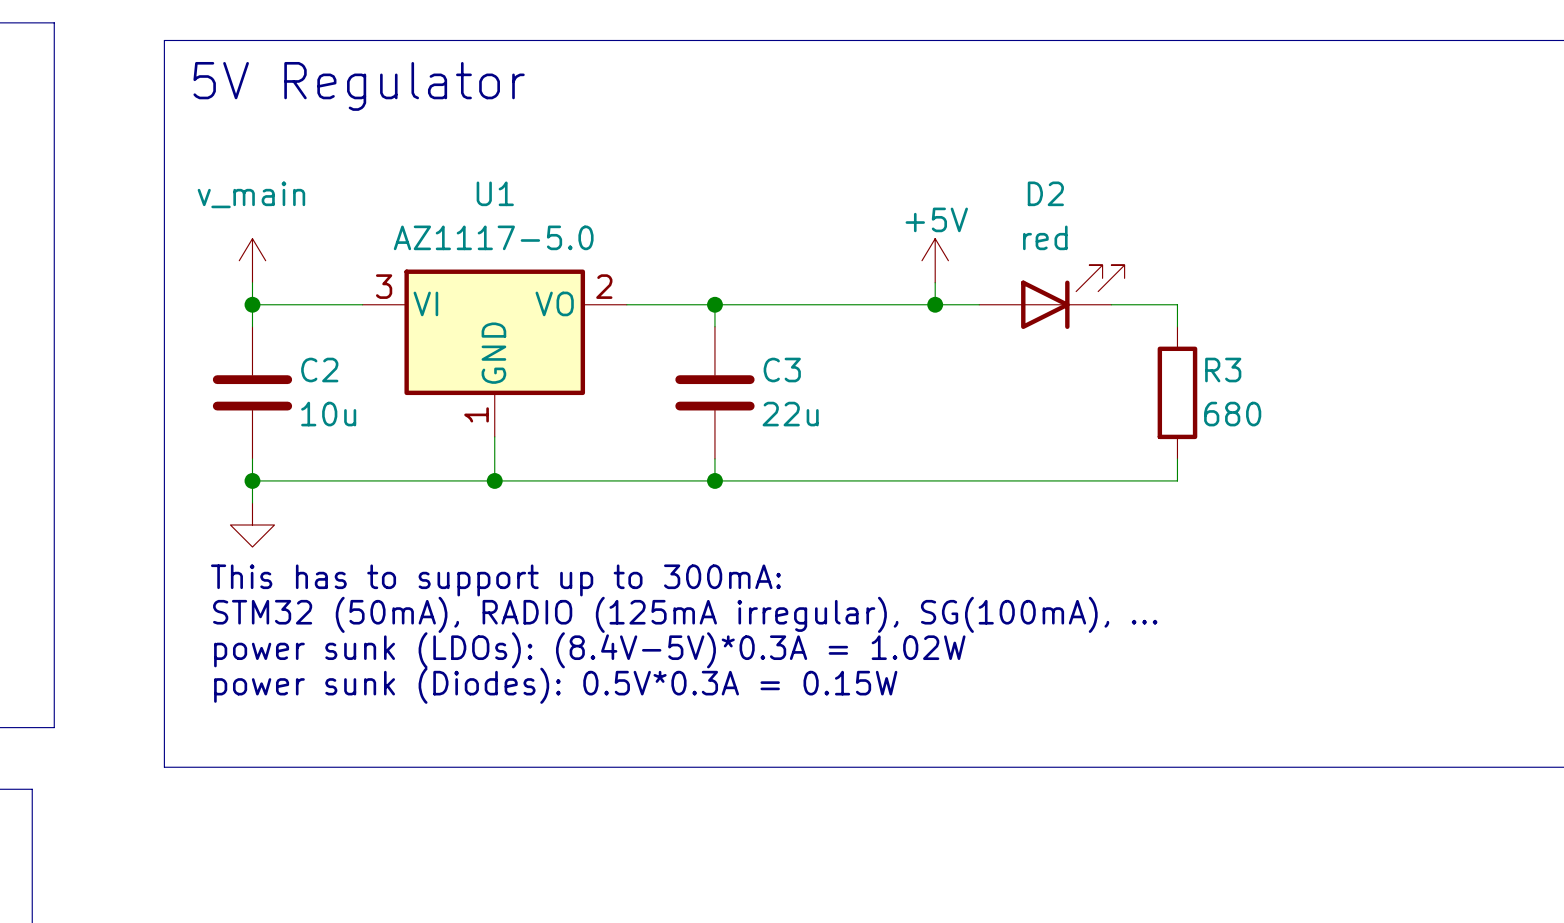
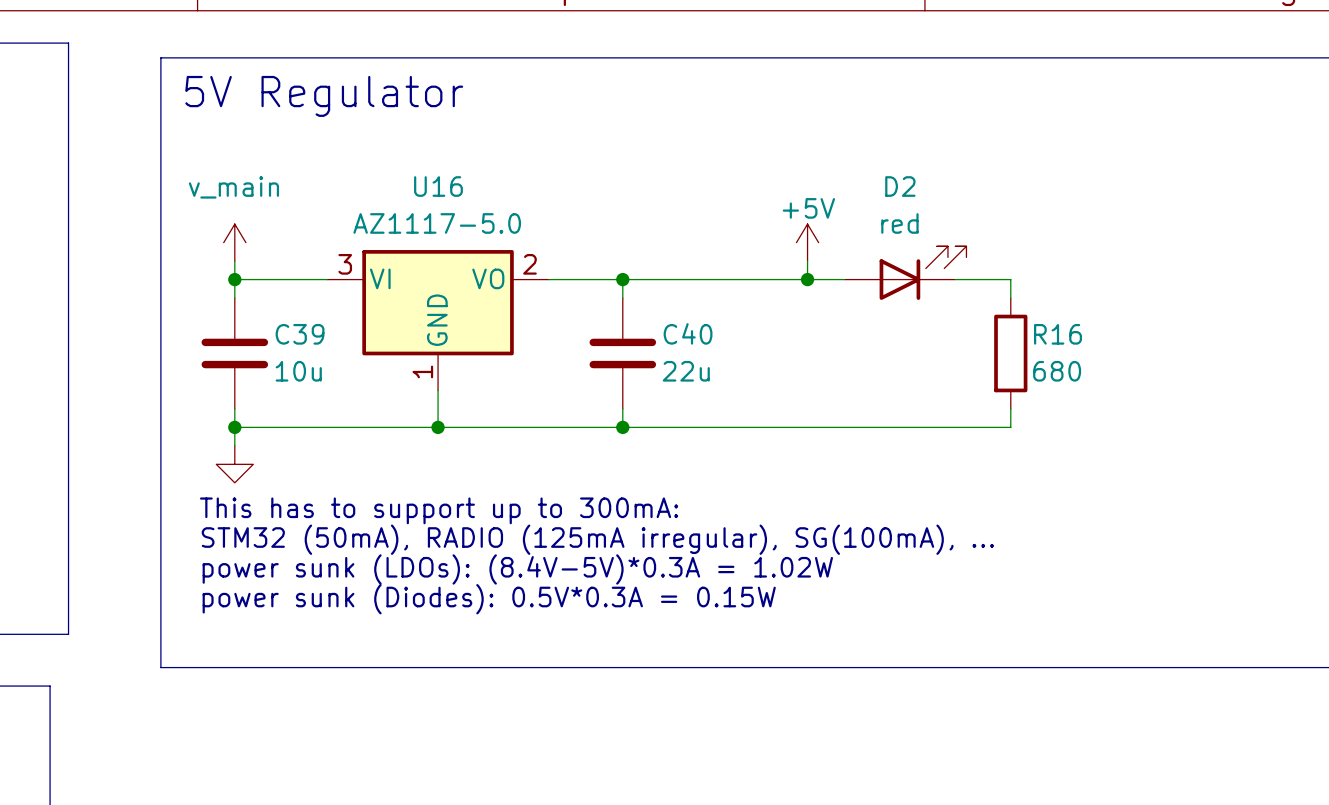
U1 name: U1 (495, 193) -> U16 (438, 186)
C2 name: C2 (319, 370) -> C39 (300, 334)
C3 name: C3 (782, 370) -> C40 (688, 333)
R3 name: R3 (1223, 370) -> R16 (1057, 334)

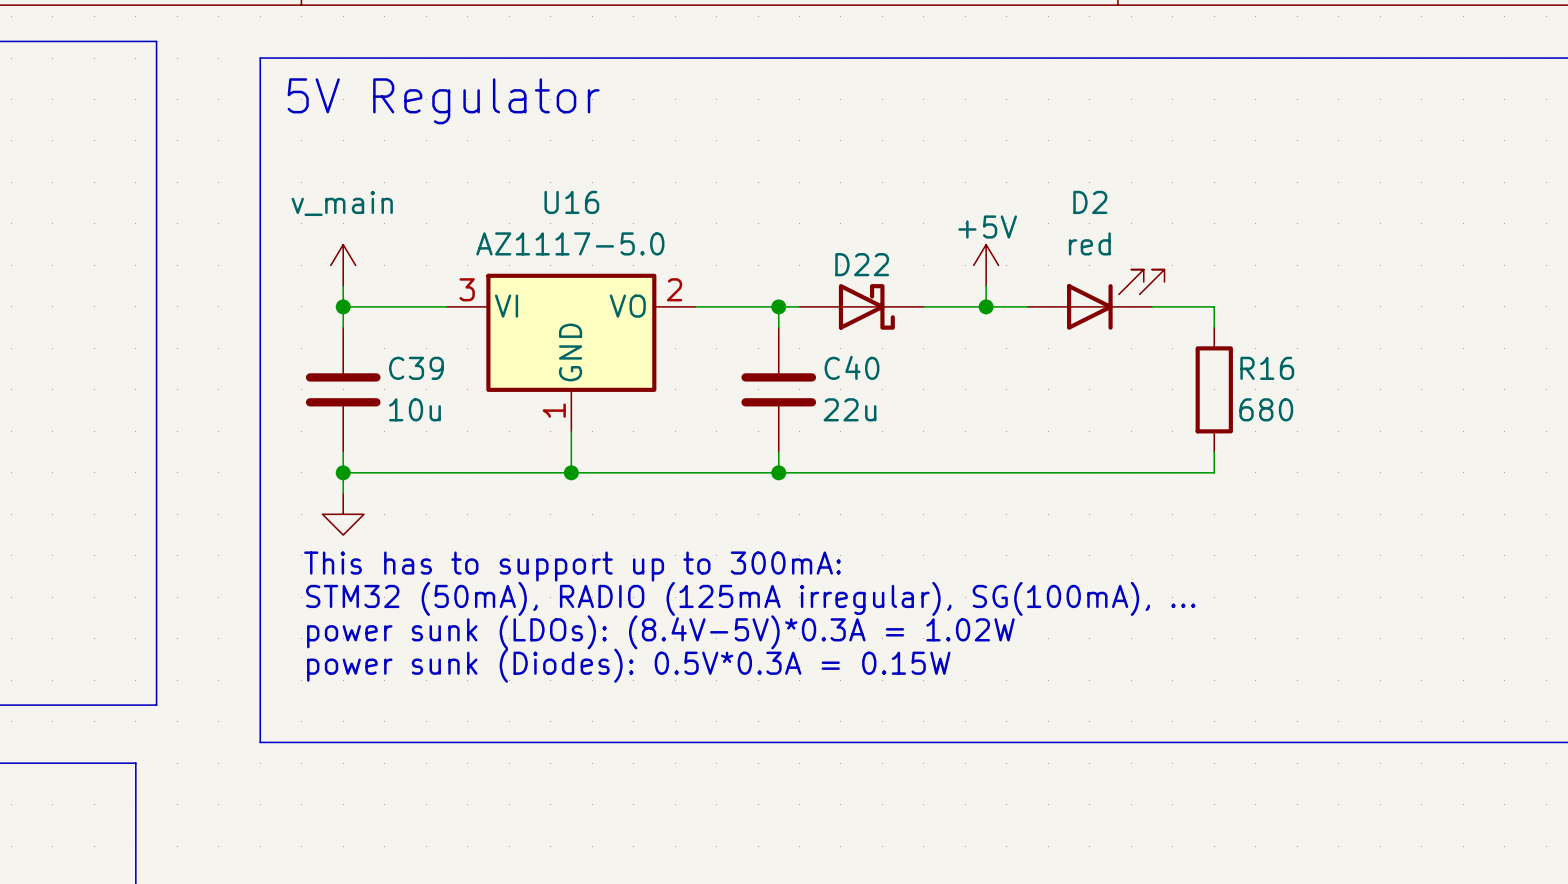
D22: none -> (861, 306)

